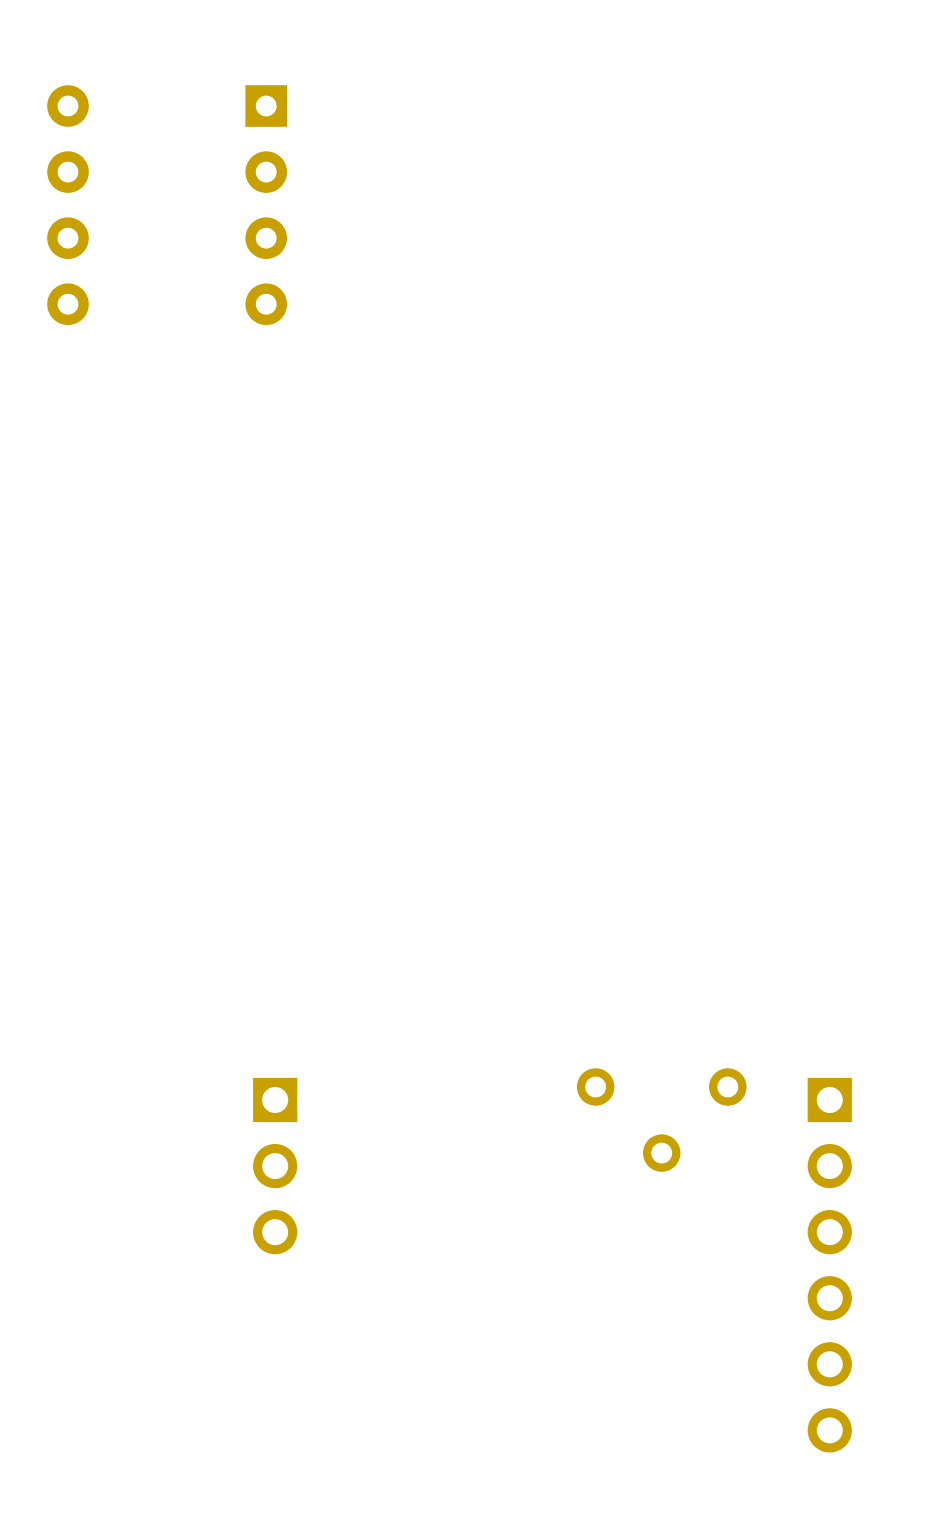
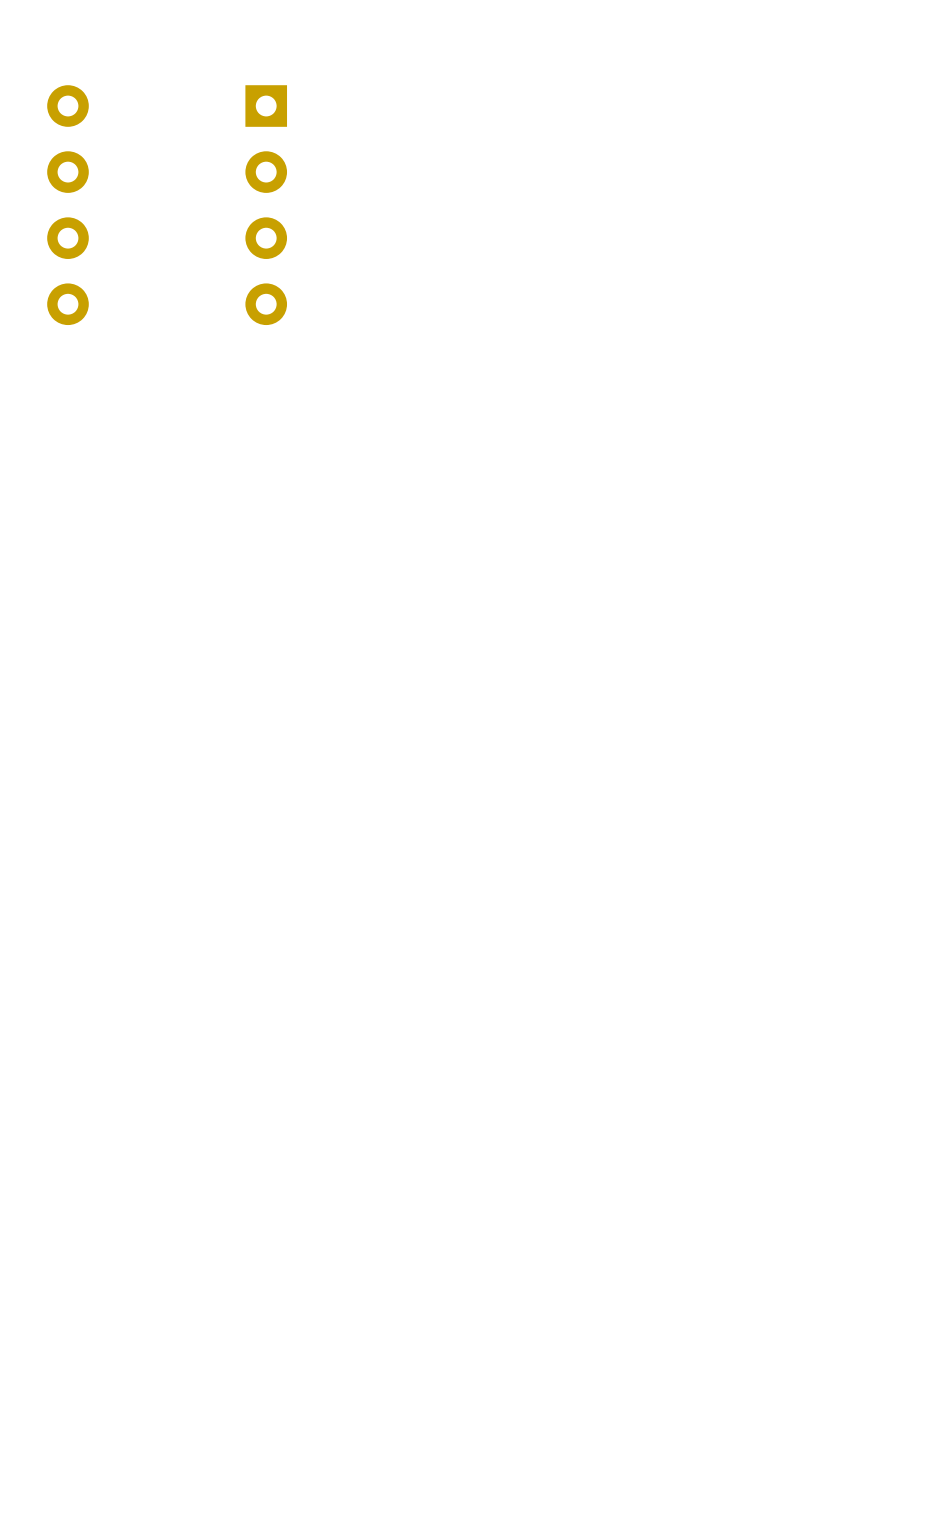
part: (661, 1120) -> none
part: (275, 1166) -> none
part: (829, 1265) -> none

